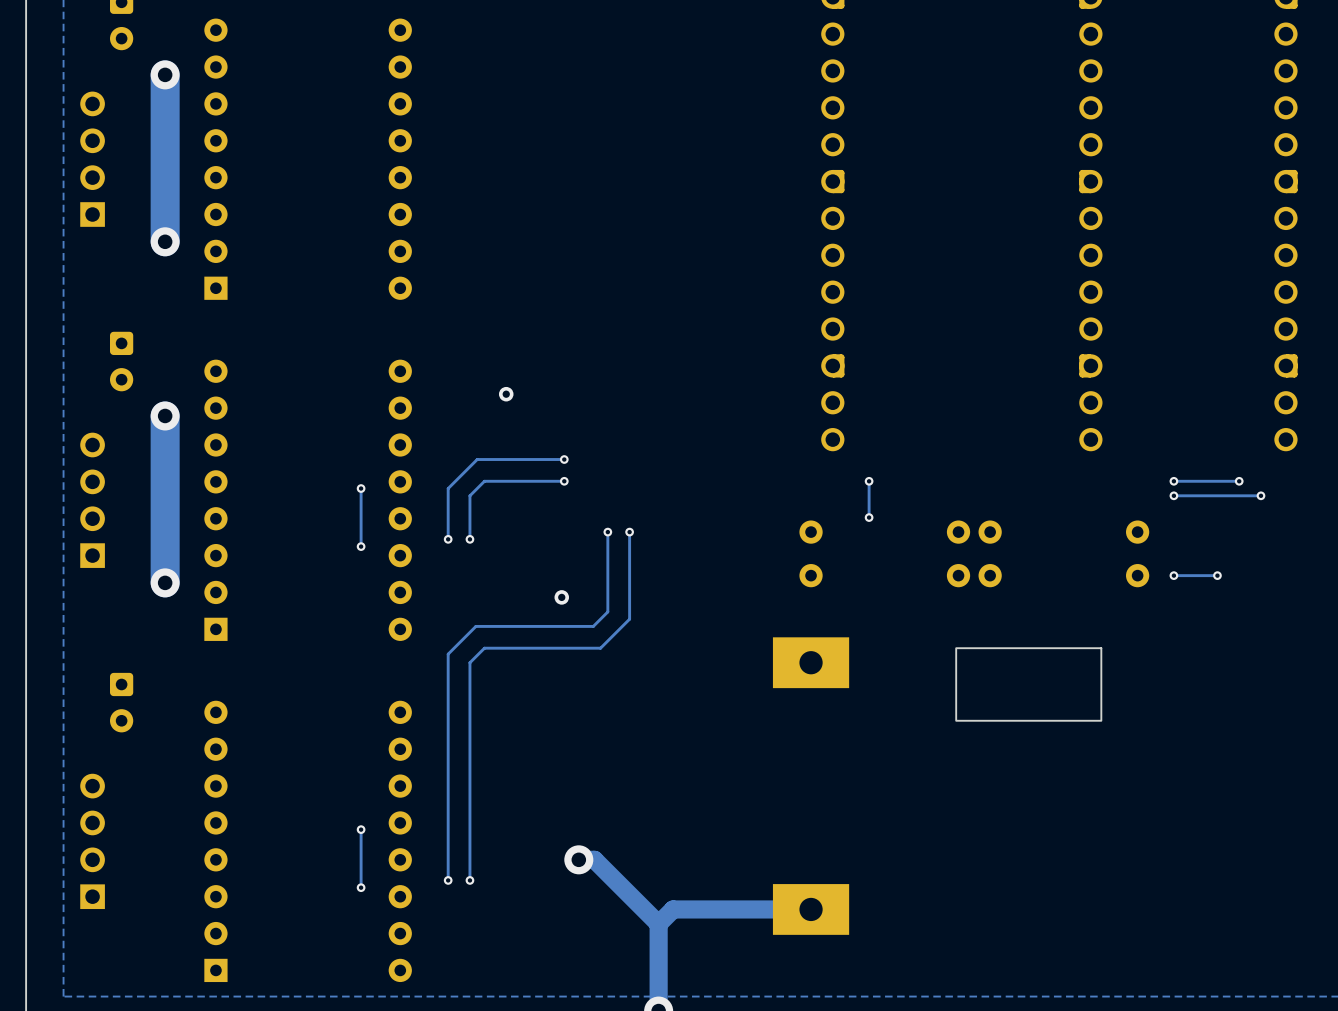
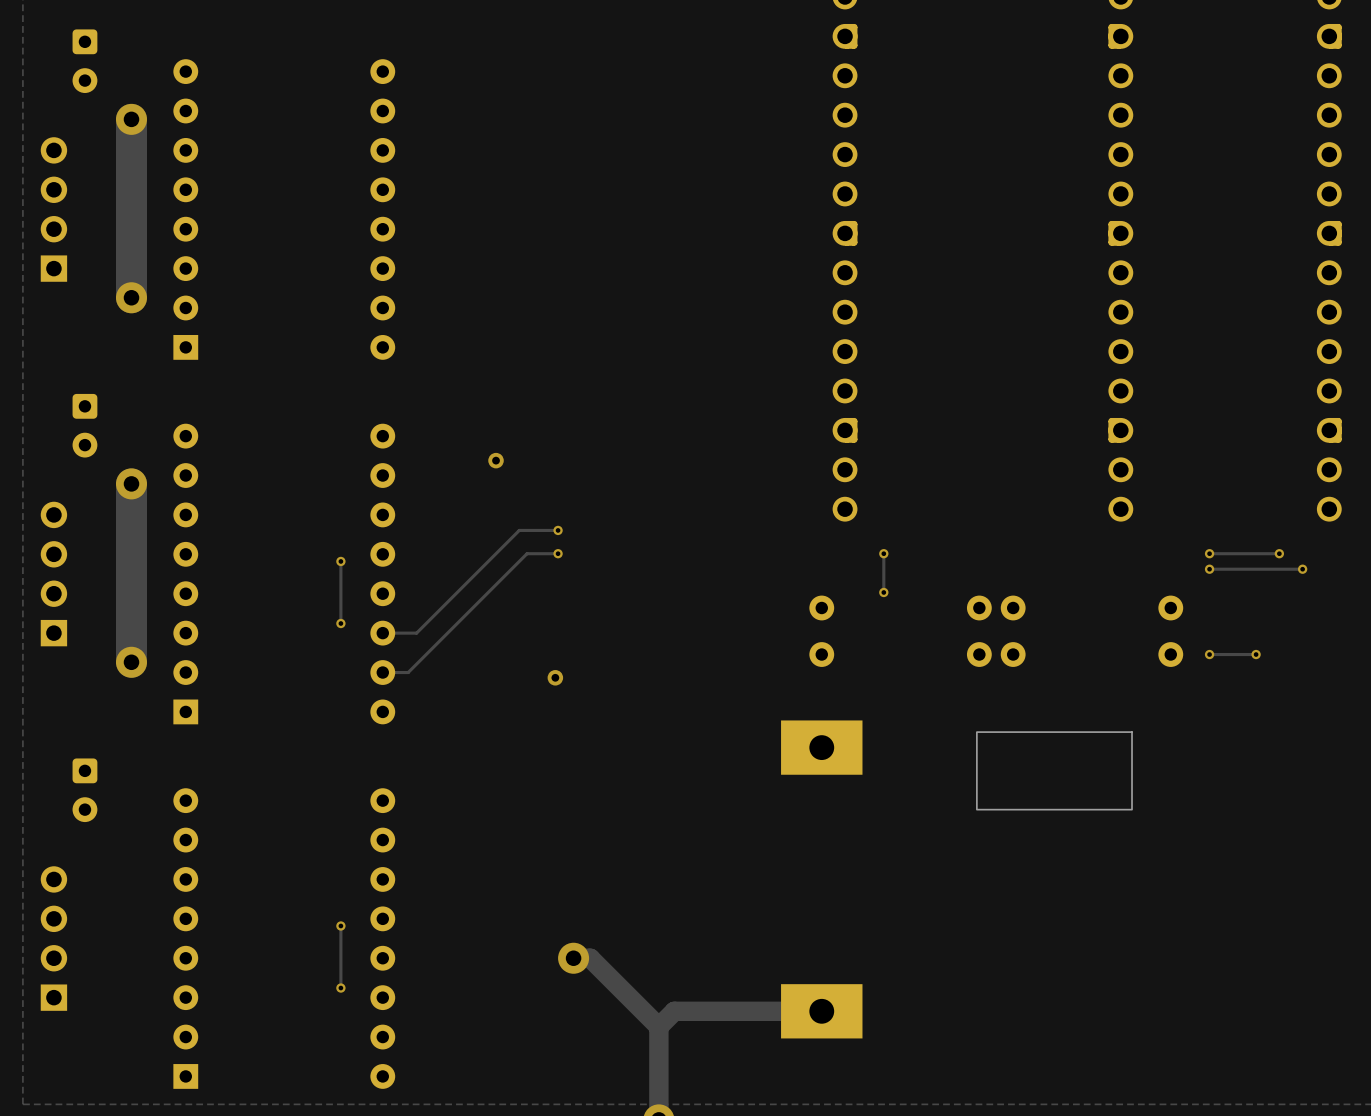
track: (528, 459) (477, 459) (448, 488) (448, 539) -> (519, 530) (416, 633) (382, 633)
track: (535, 481) (484, 481) (469, 495) (469, 539) -> (527, 553) (408, 672) (382, 672)
track: (607, 532) (607, 611) (593, 626) (475, 626) (448, 654) (448, 880) -> none
via: (607, 532) -> none
track: (629, 532) (629, 619) (600, 648) (484, 648) (469, 662) (469, 880) -> none
via: (629, 532) -> none
via: (448, 539) -> none
via: (469, 539) -> none
via: (448, 880) -> none
via: (469, 880) -> none

